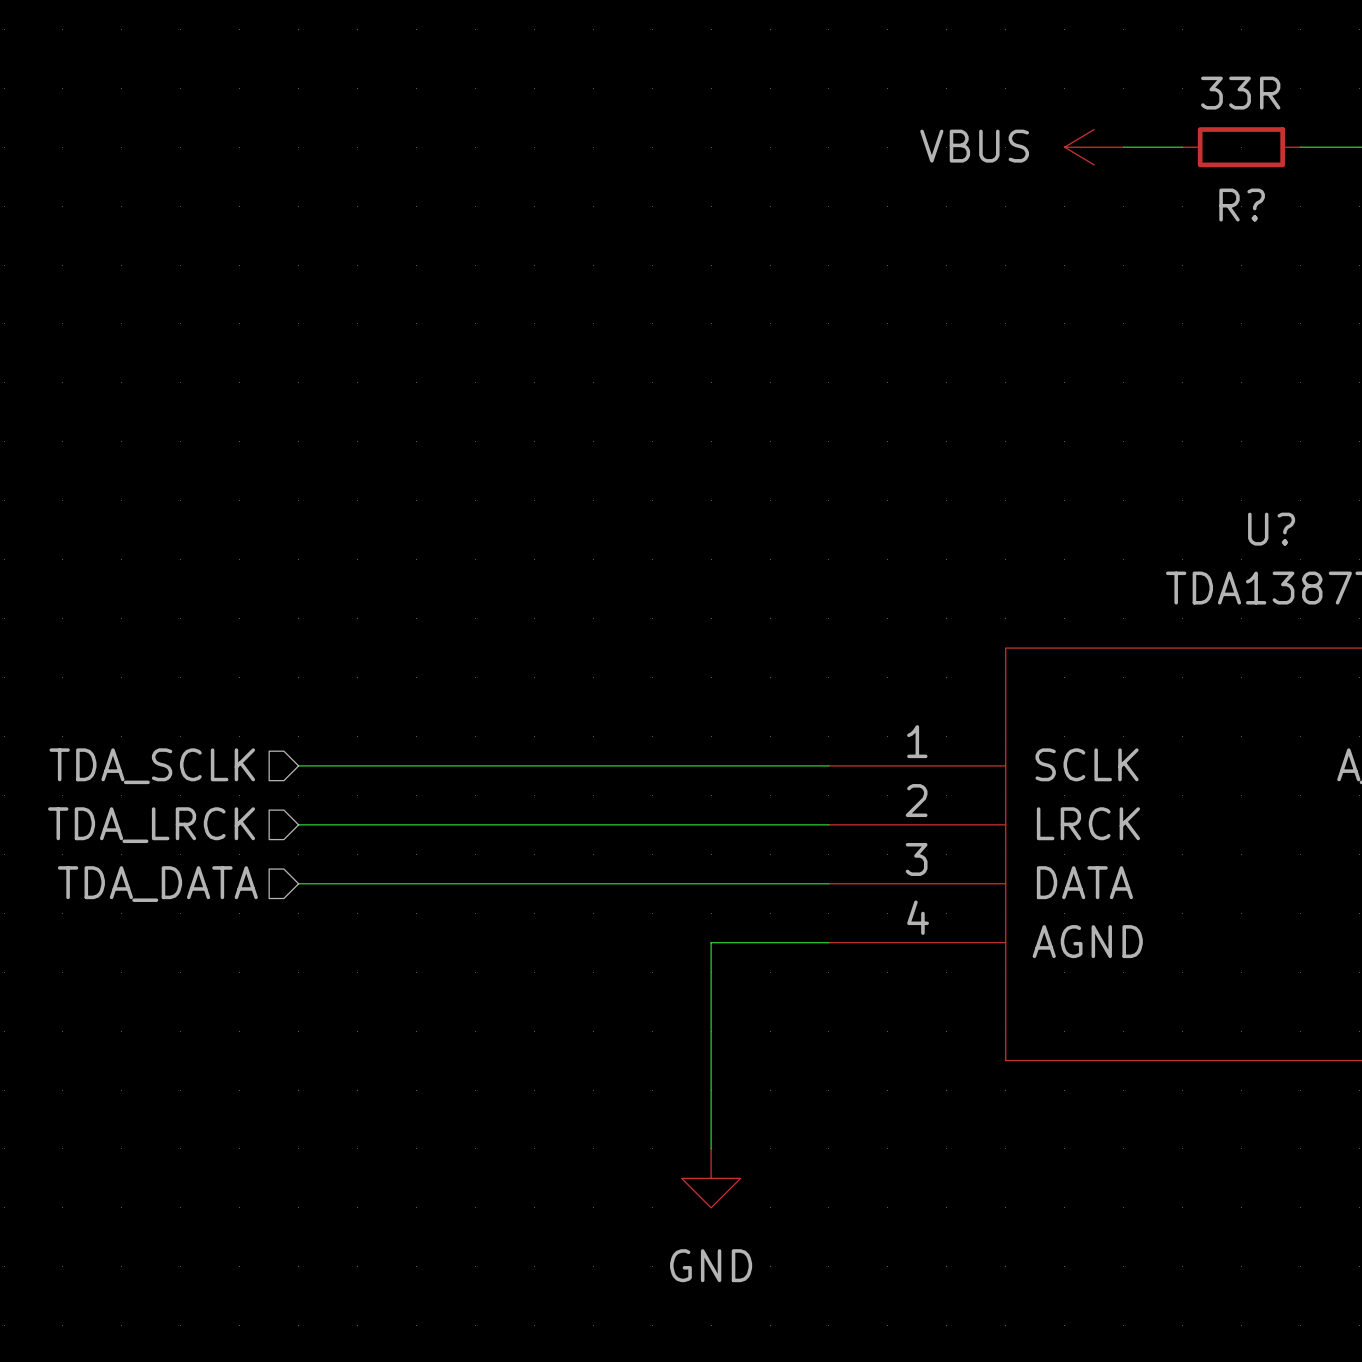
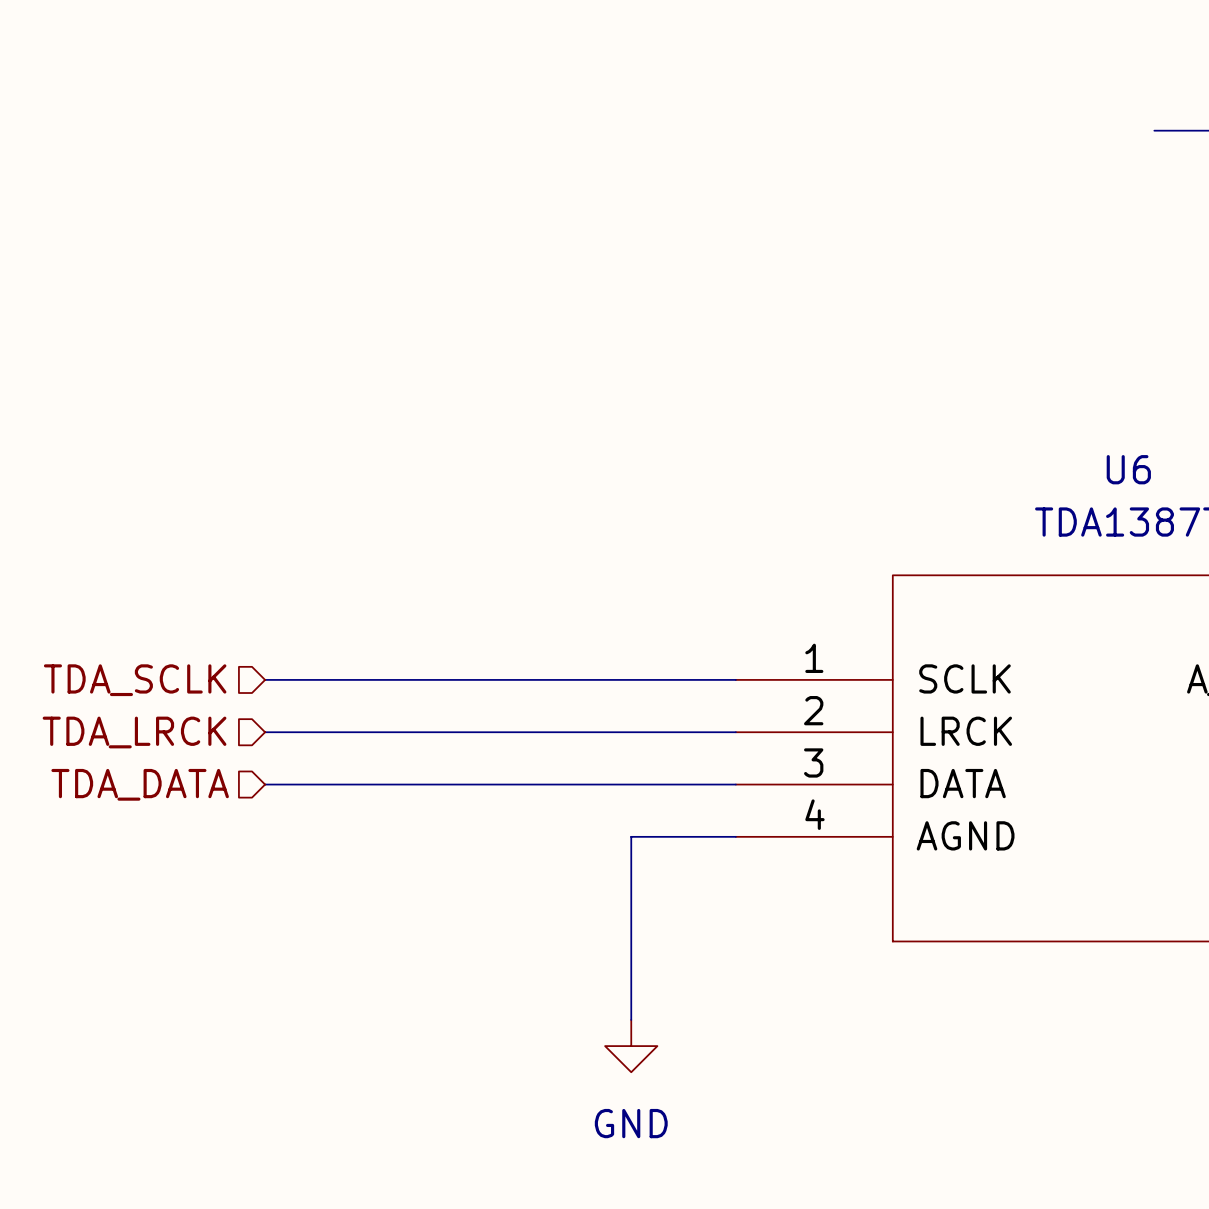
power symbol: VBUS (1094, 147) -> none
wire: (1123, 147) (1182, 147) -> none
R?: 33R (1241, 147) -> none
U? name: U? (1271, 529) -> U6 (1128, 469)

